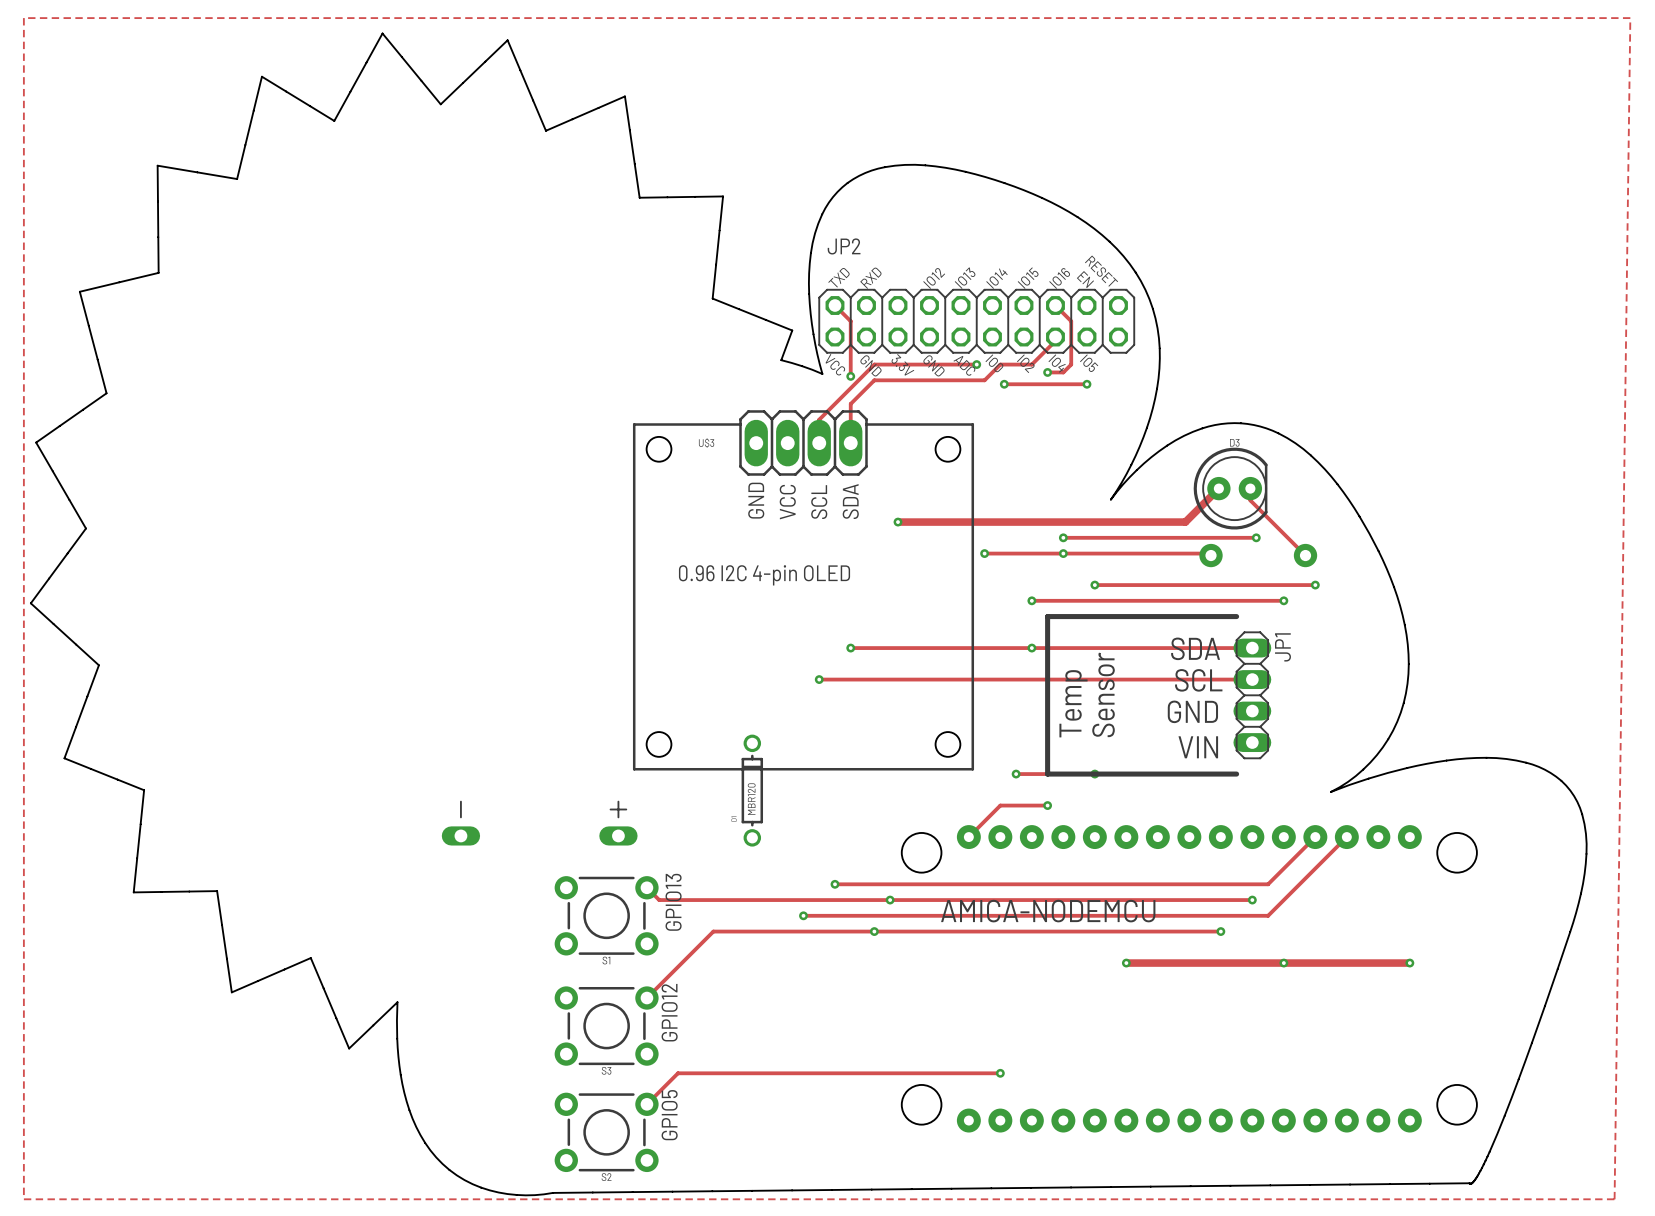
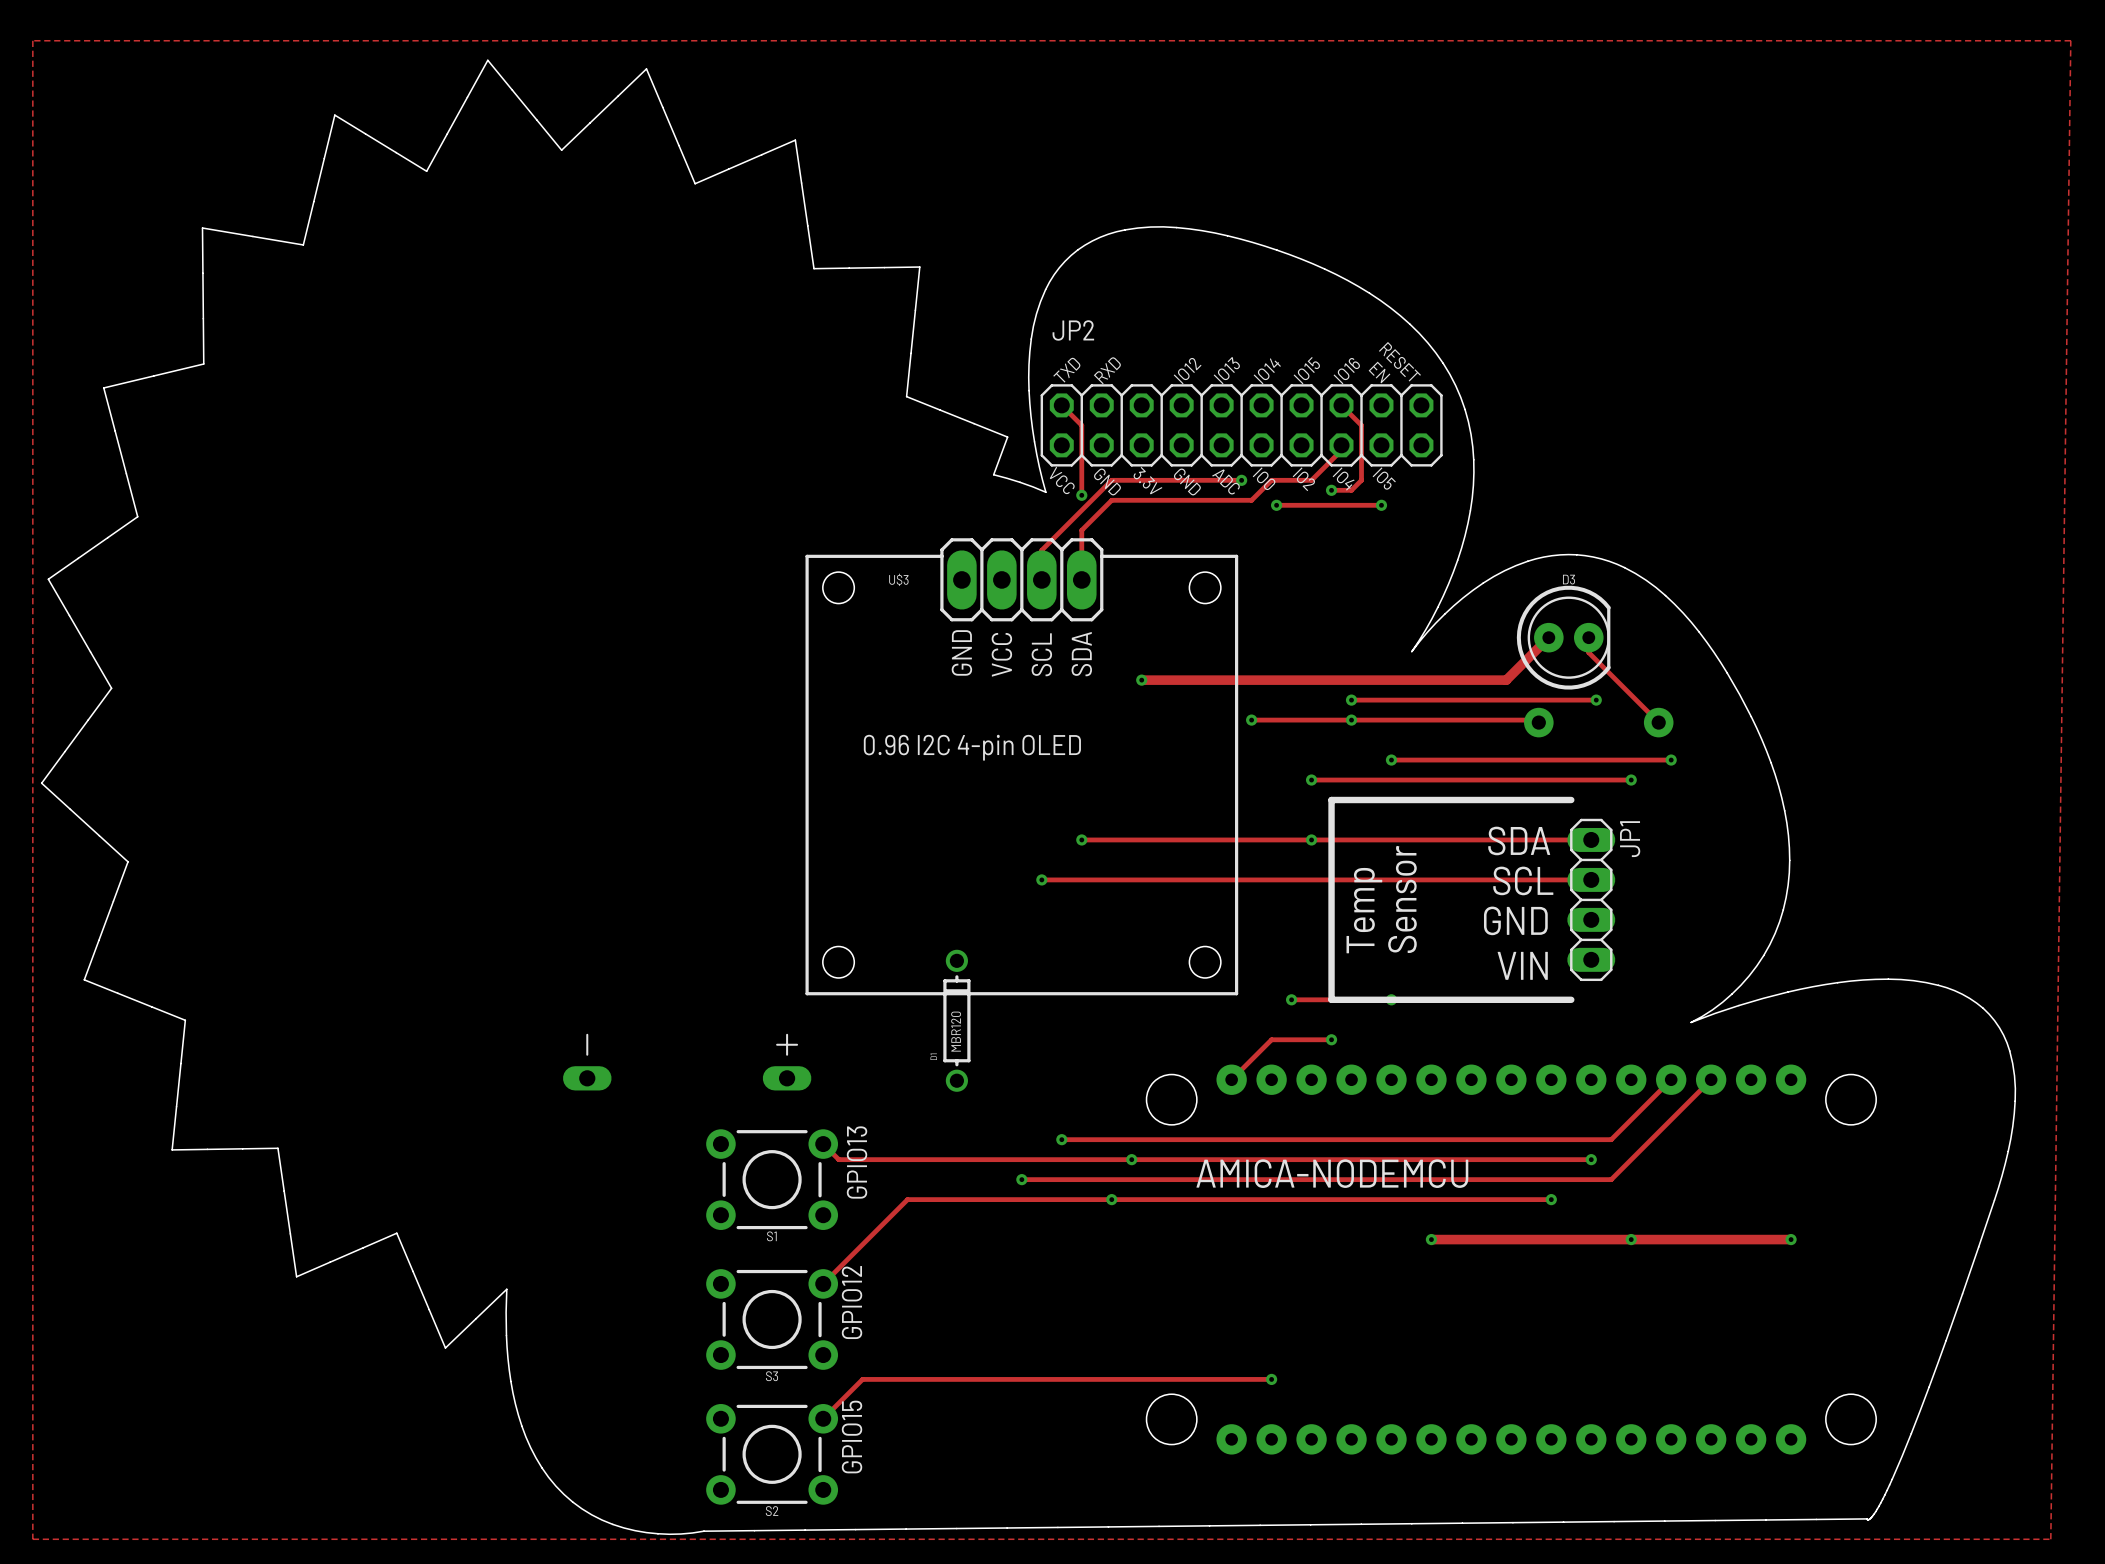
text: GPIO5 (669, 1115) -> GPIO15 (852, 1437)

